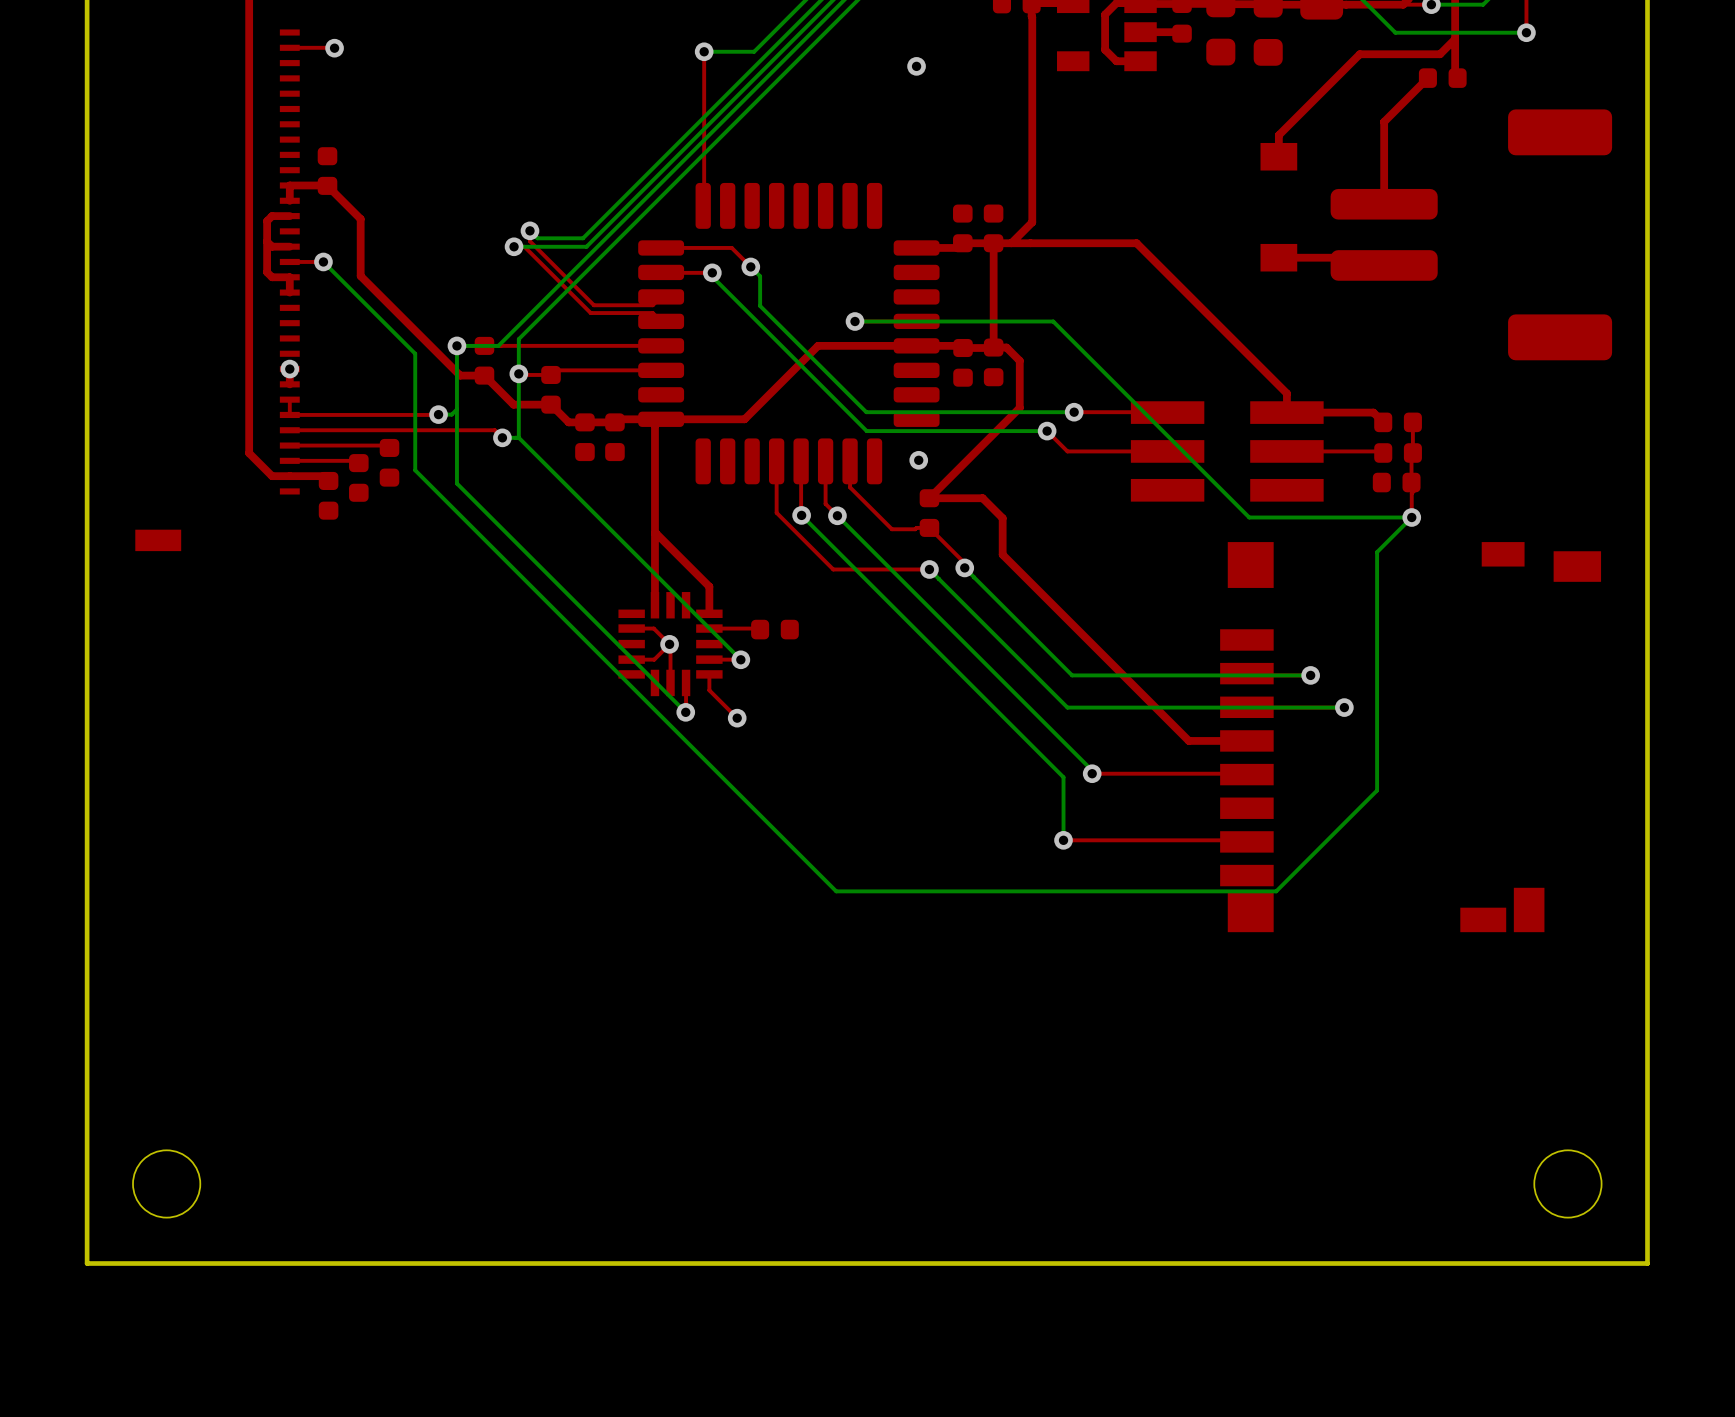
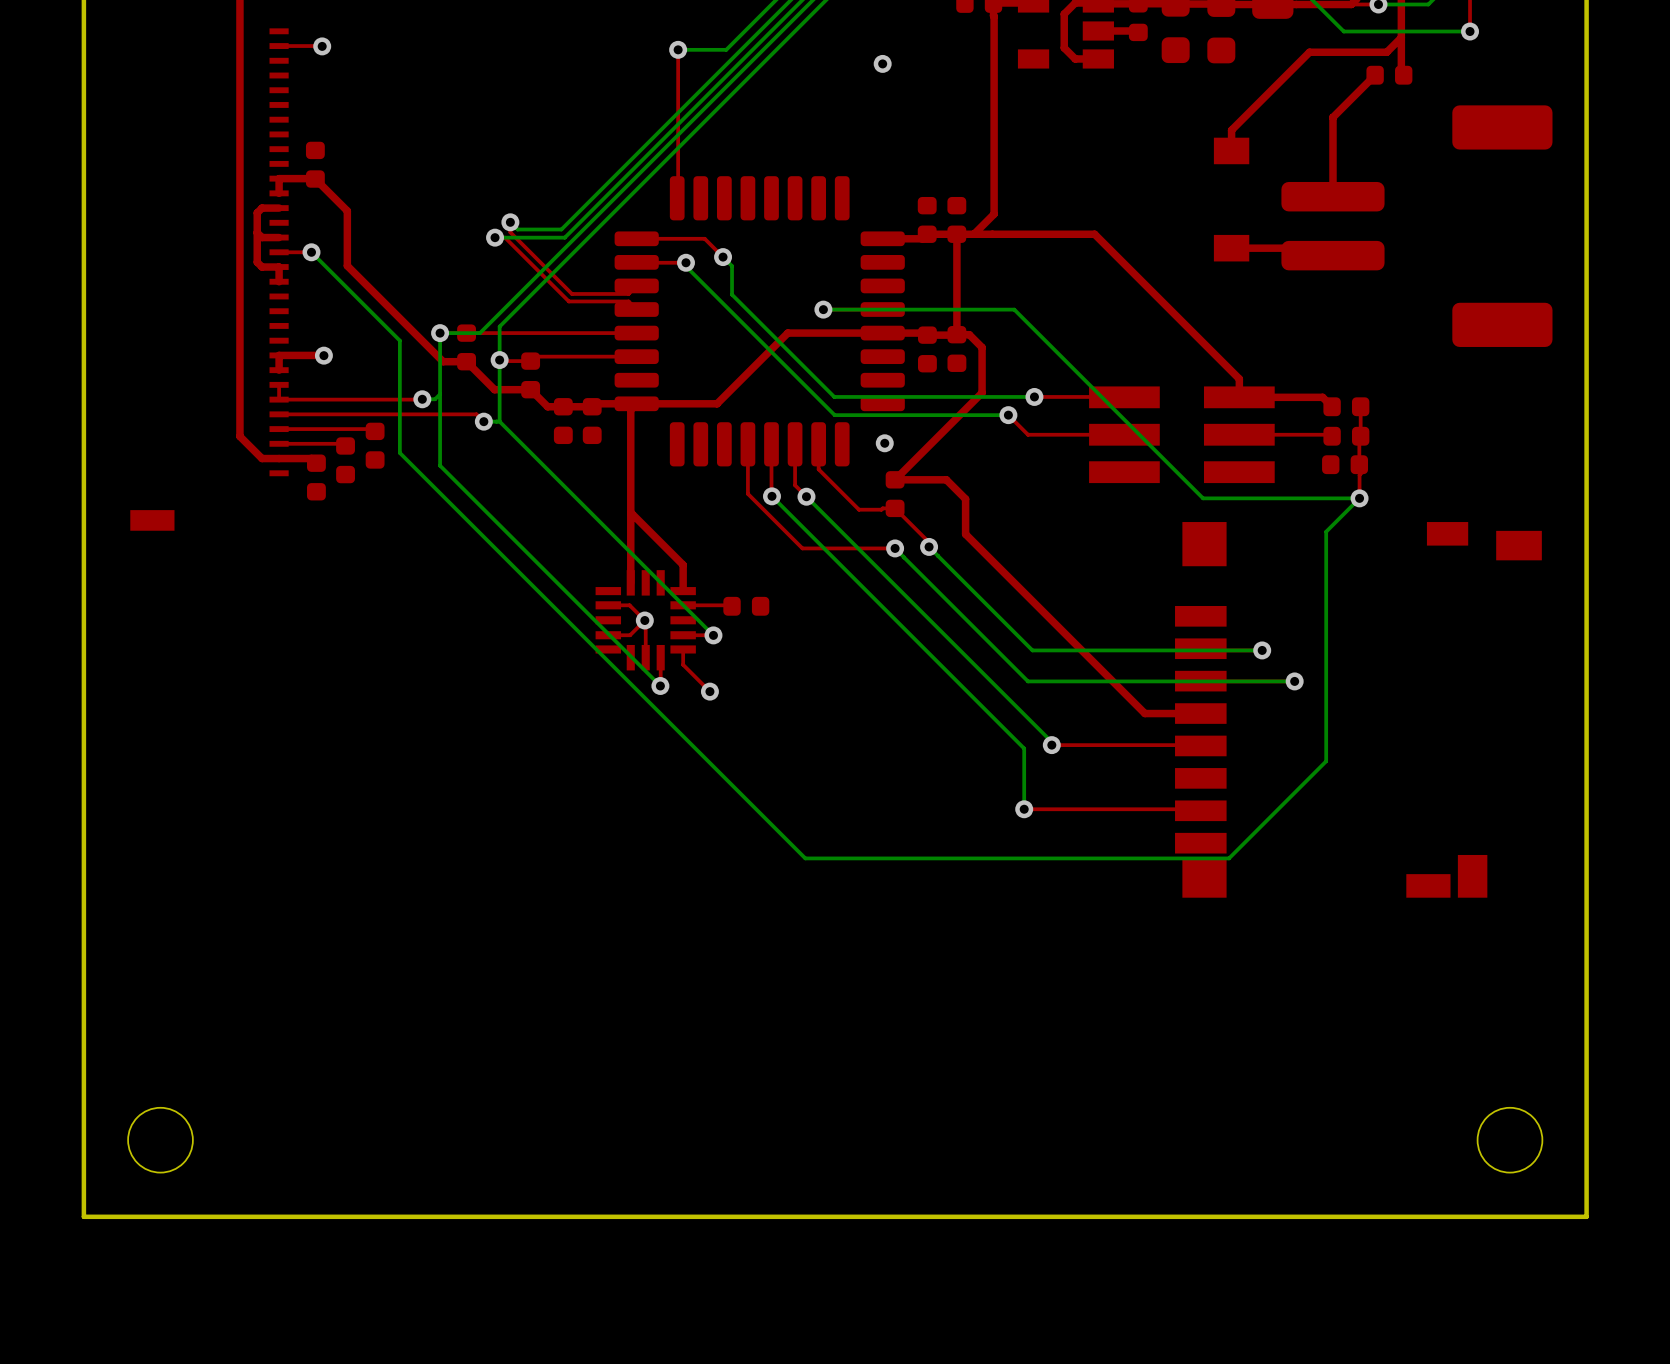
via position: (289, 369) -> (323, 355)
top track: none -> (323, 355) (279, 355)

